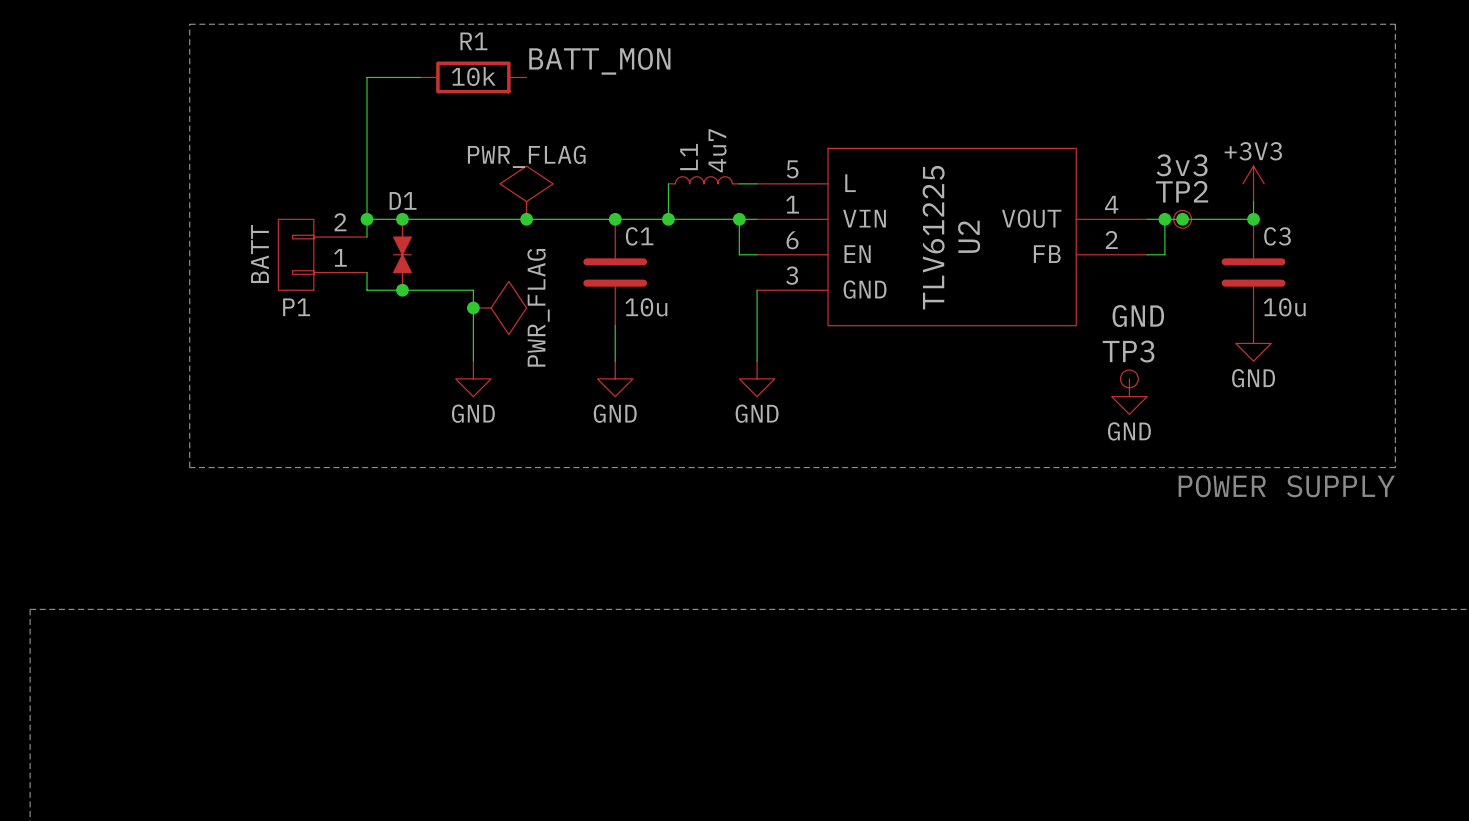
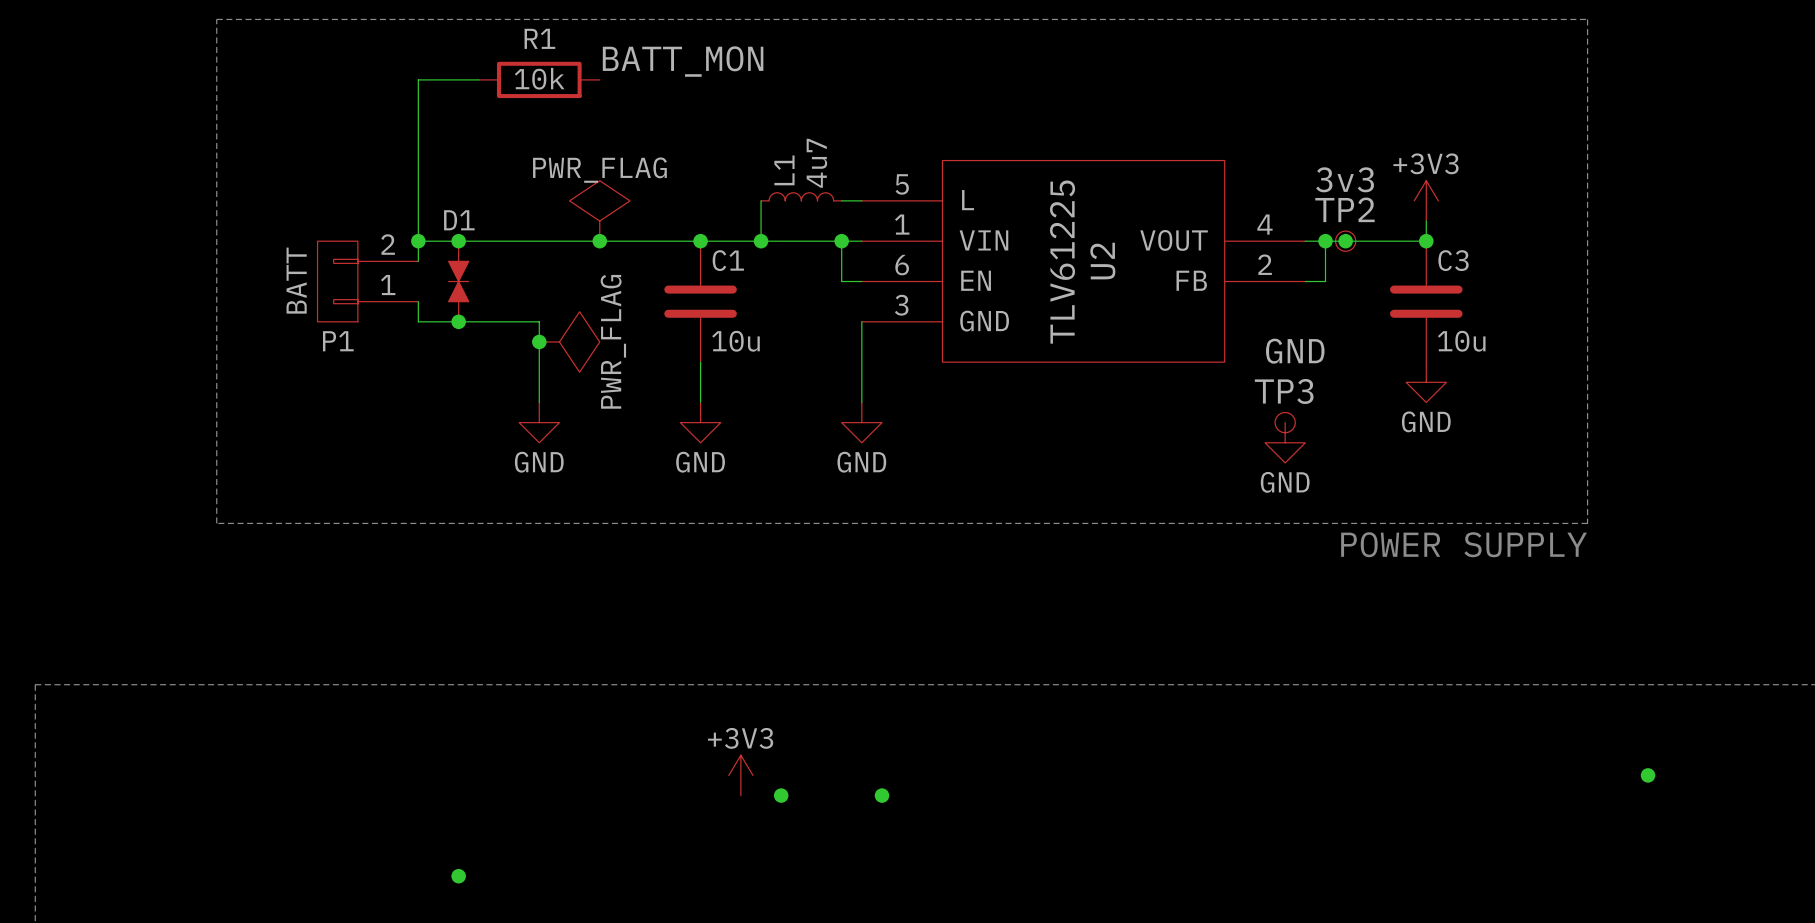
power symbol: none -> +3V3 (740, 775)
junction: none -> (1648, 775)
junction: none -> (781, 795)
junction: none -> (881, 795)
junction: none -> (458, 876)

